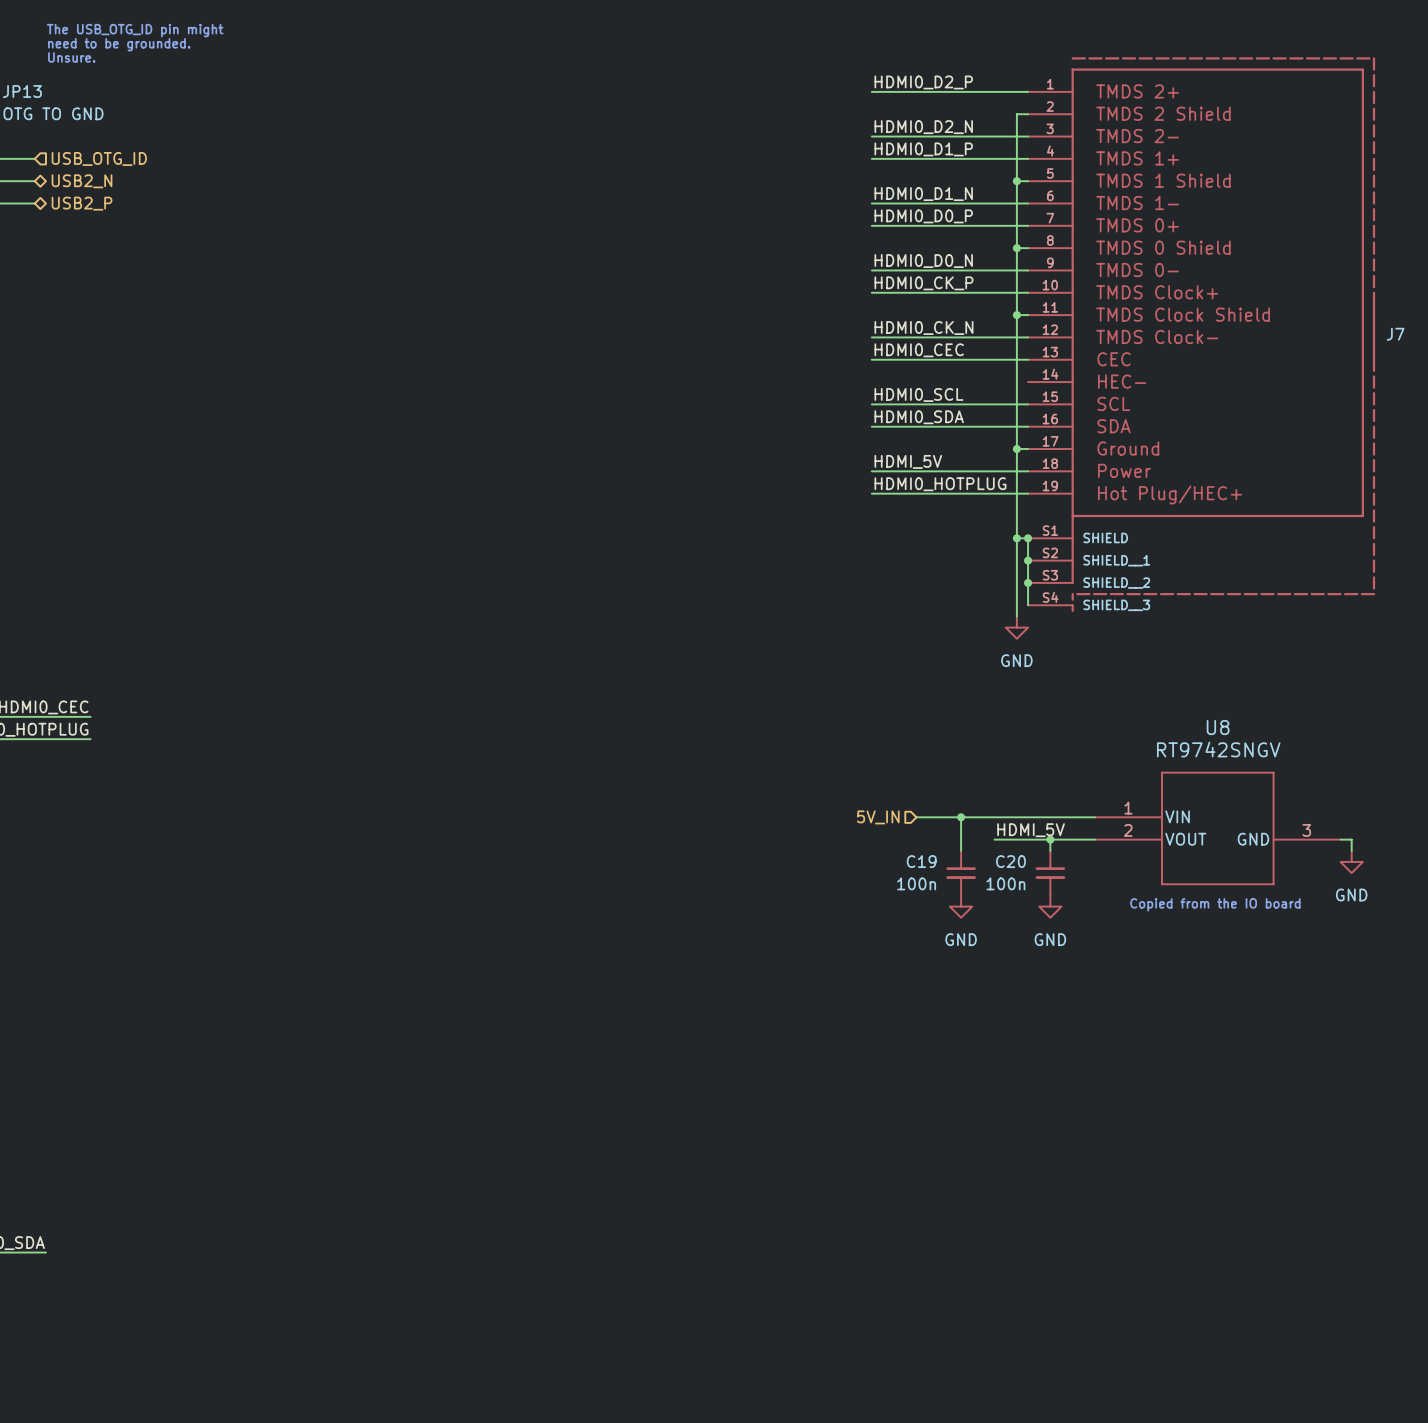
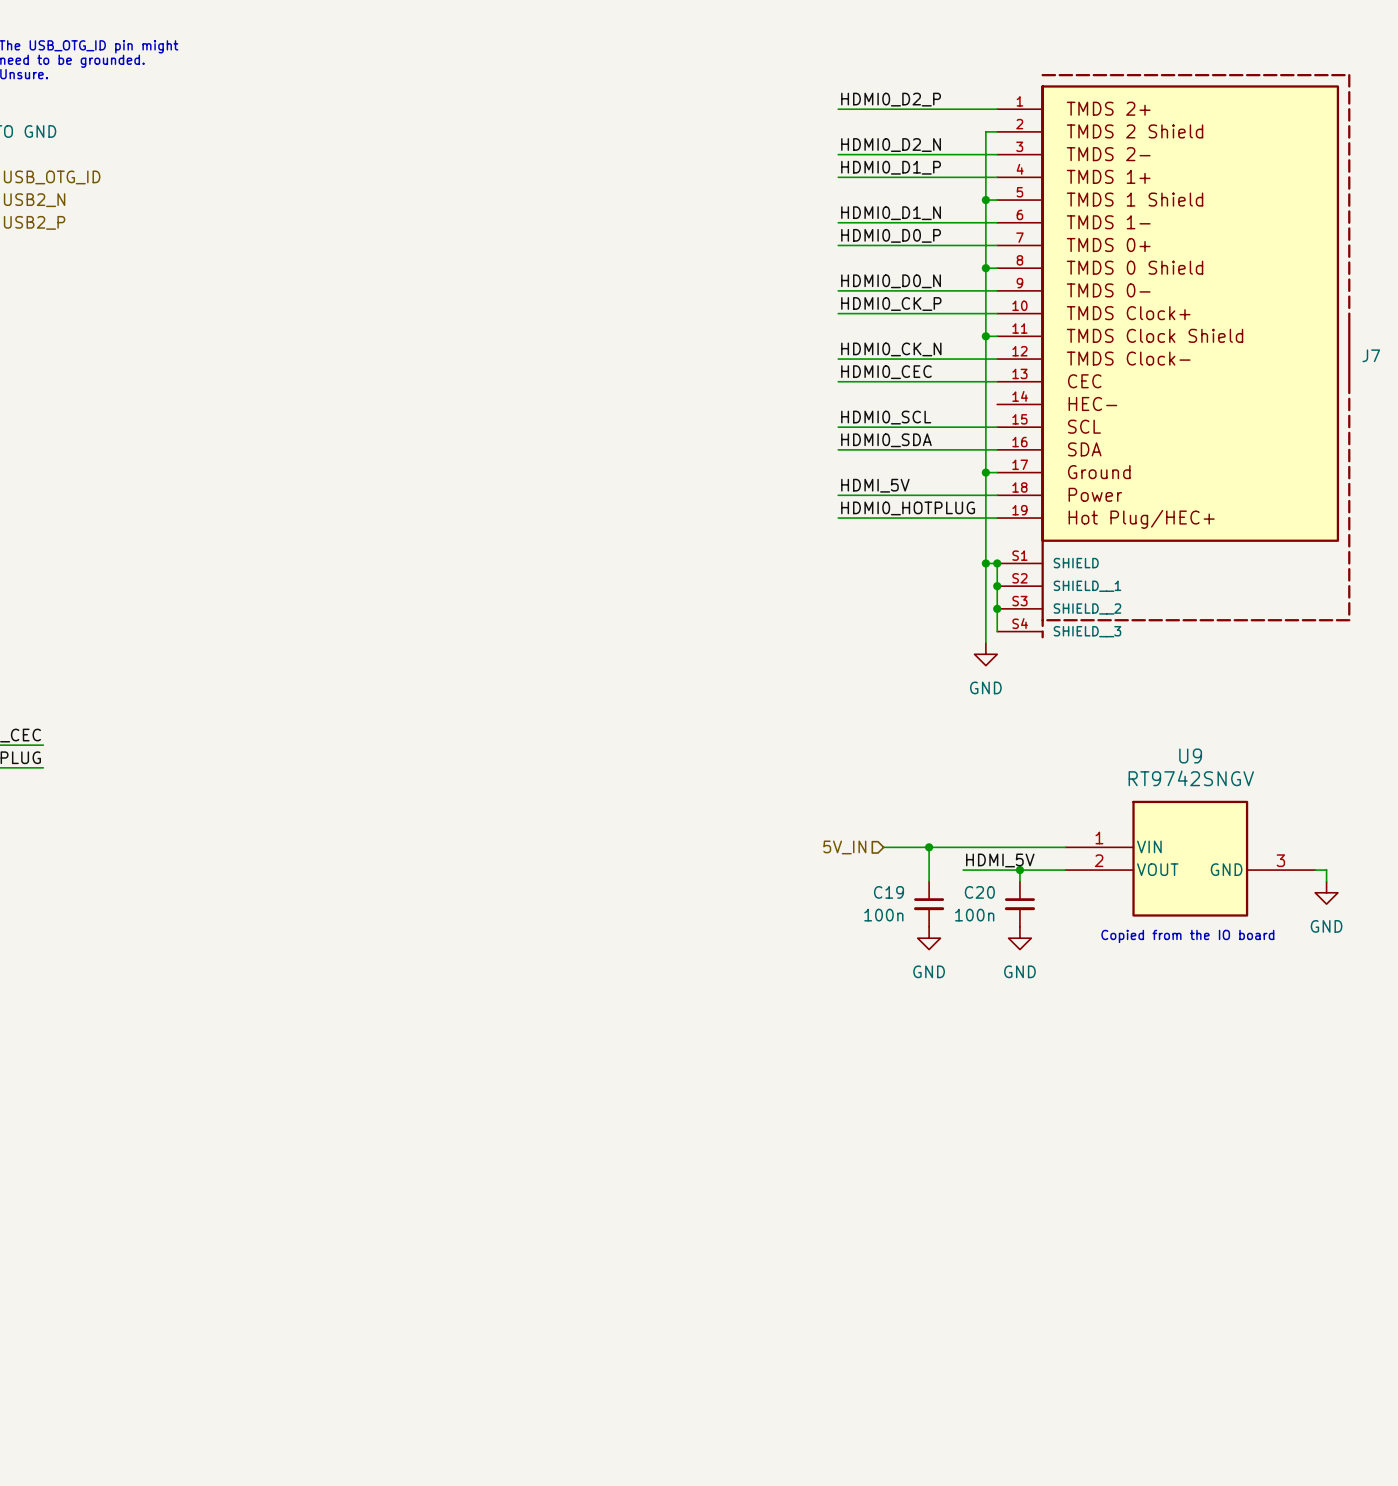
J7 symbol: [1028, 57, 1376, 612] -> [997, 73, 1351, 639]
U8: RT9742SNGV (1217, 828) -> none
U9: none -> RT9742SNGV (1190, 858)

